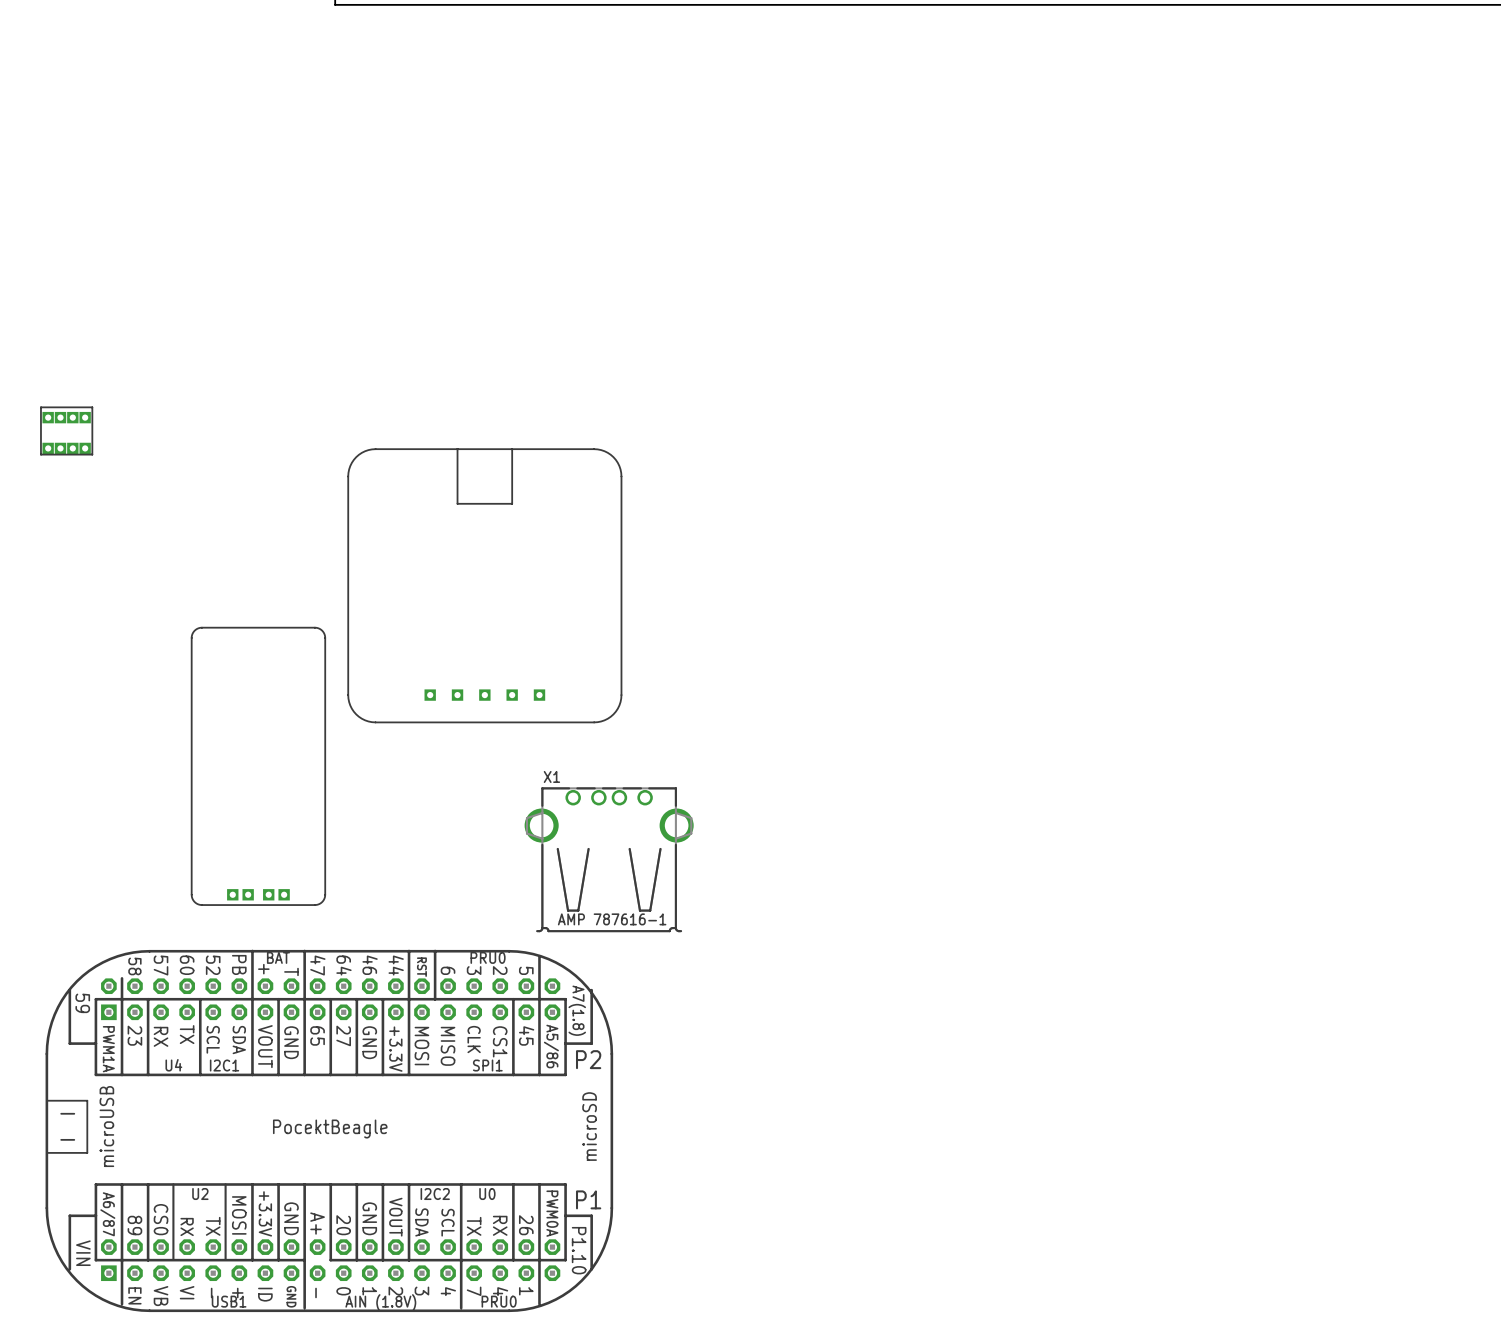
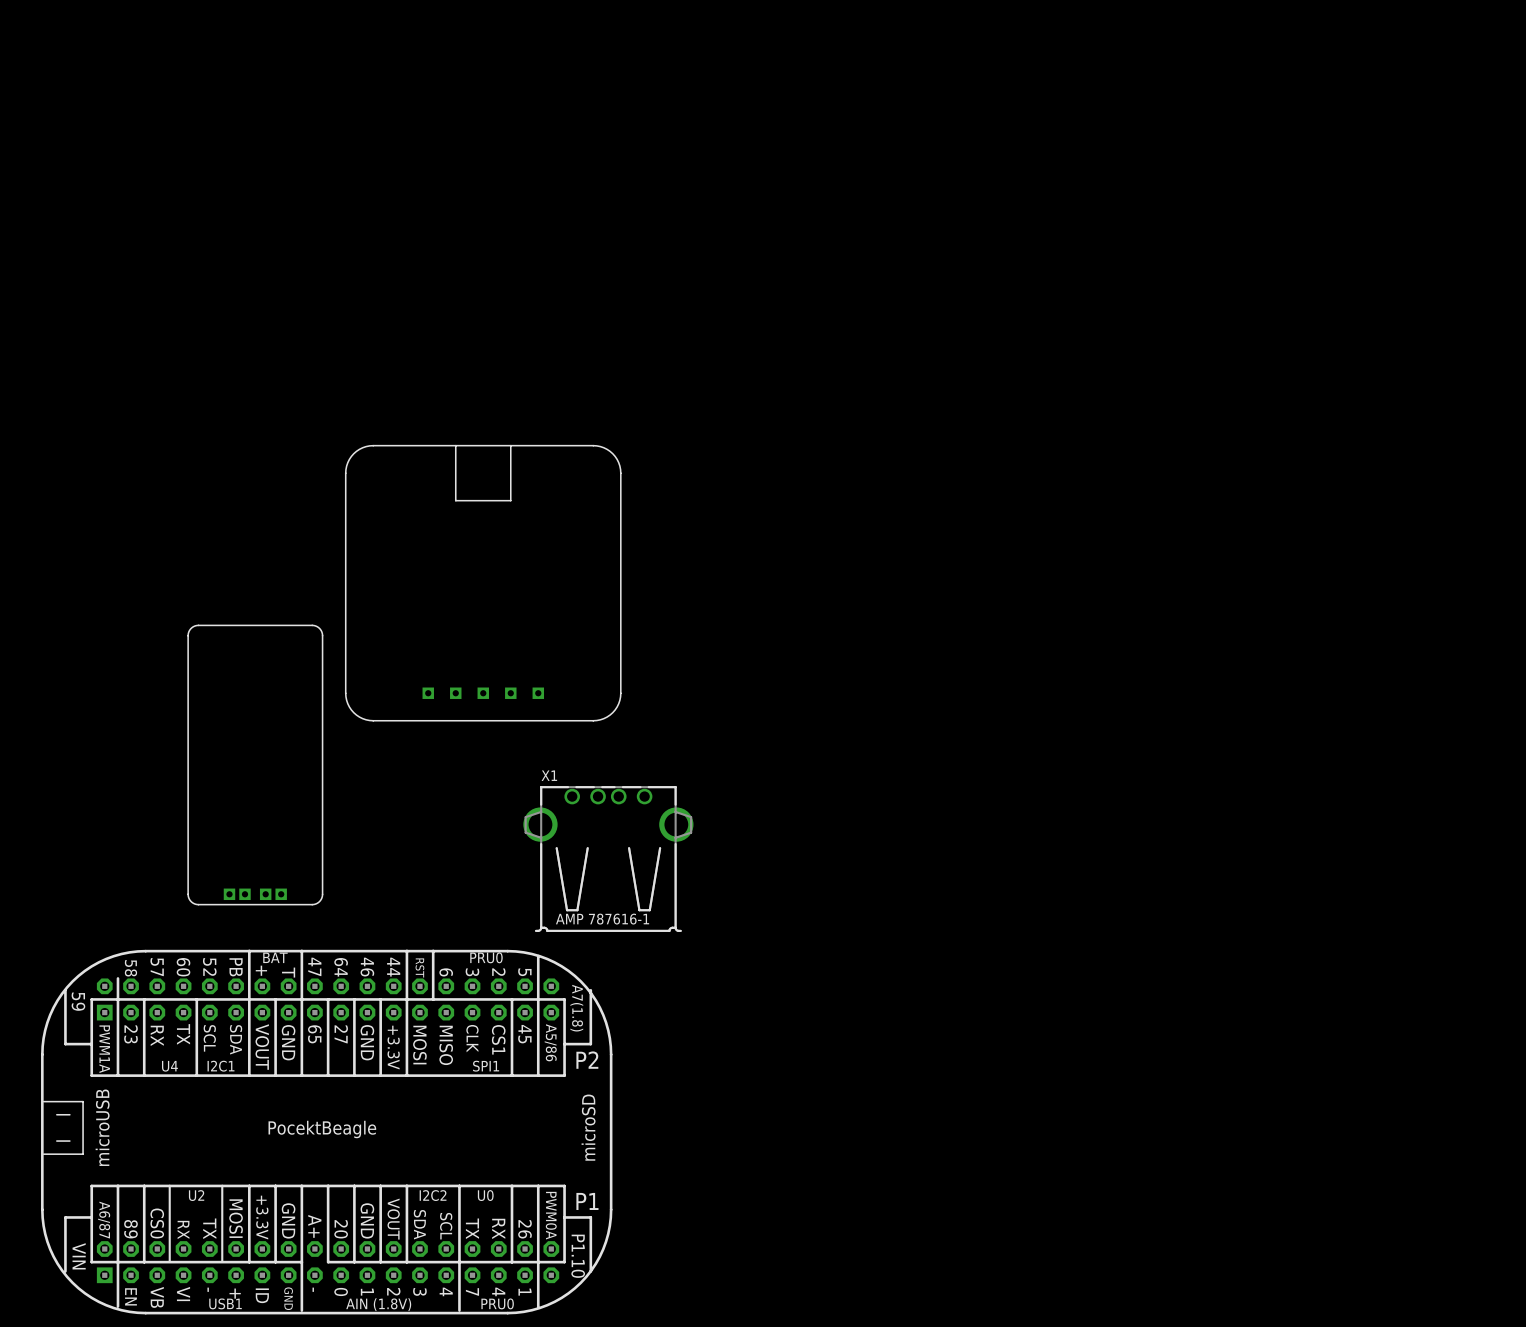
part: (66, 430) -> none

